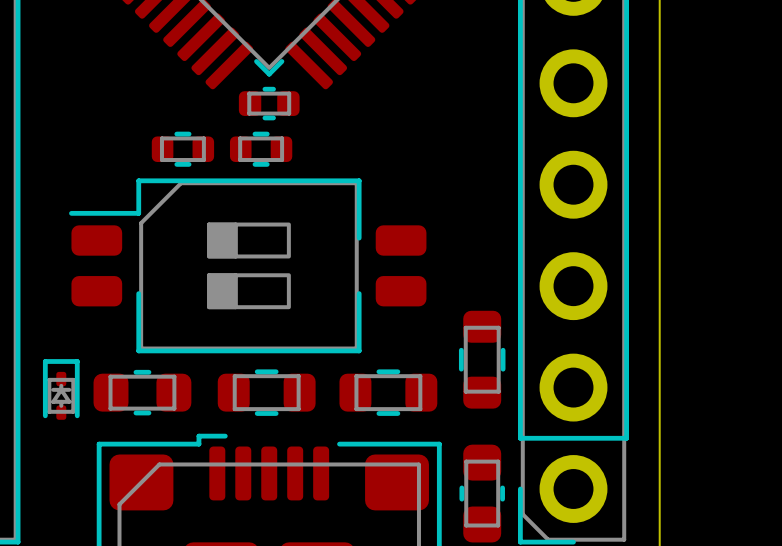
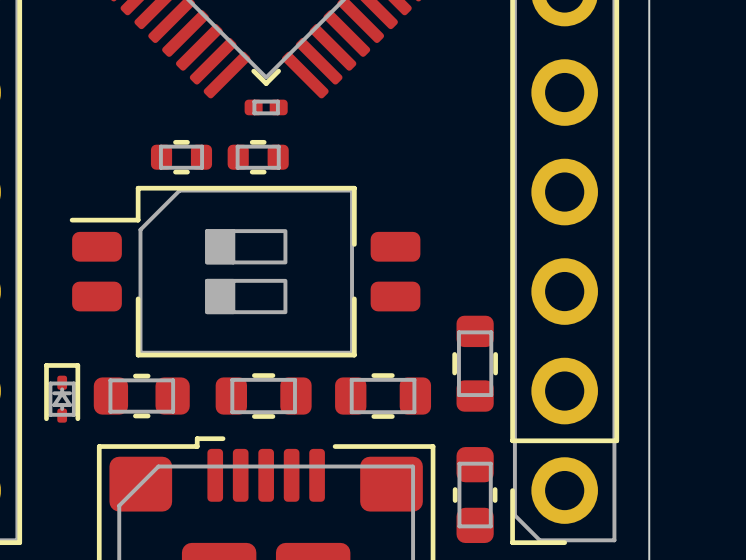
part footprint: [238, 86, 300, 121] -> [244, 99, 288, 116]

